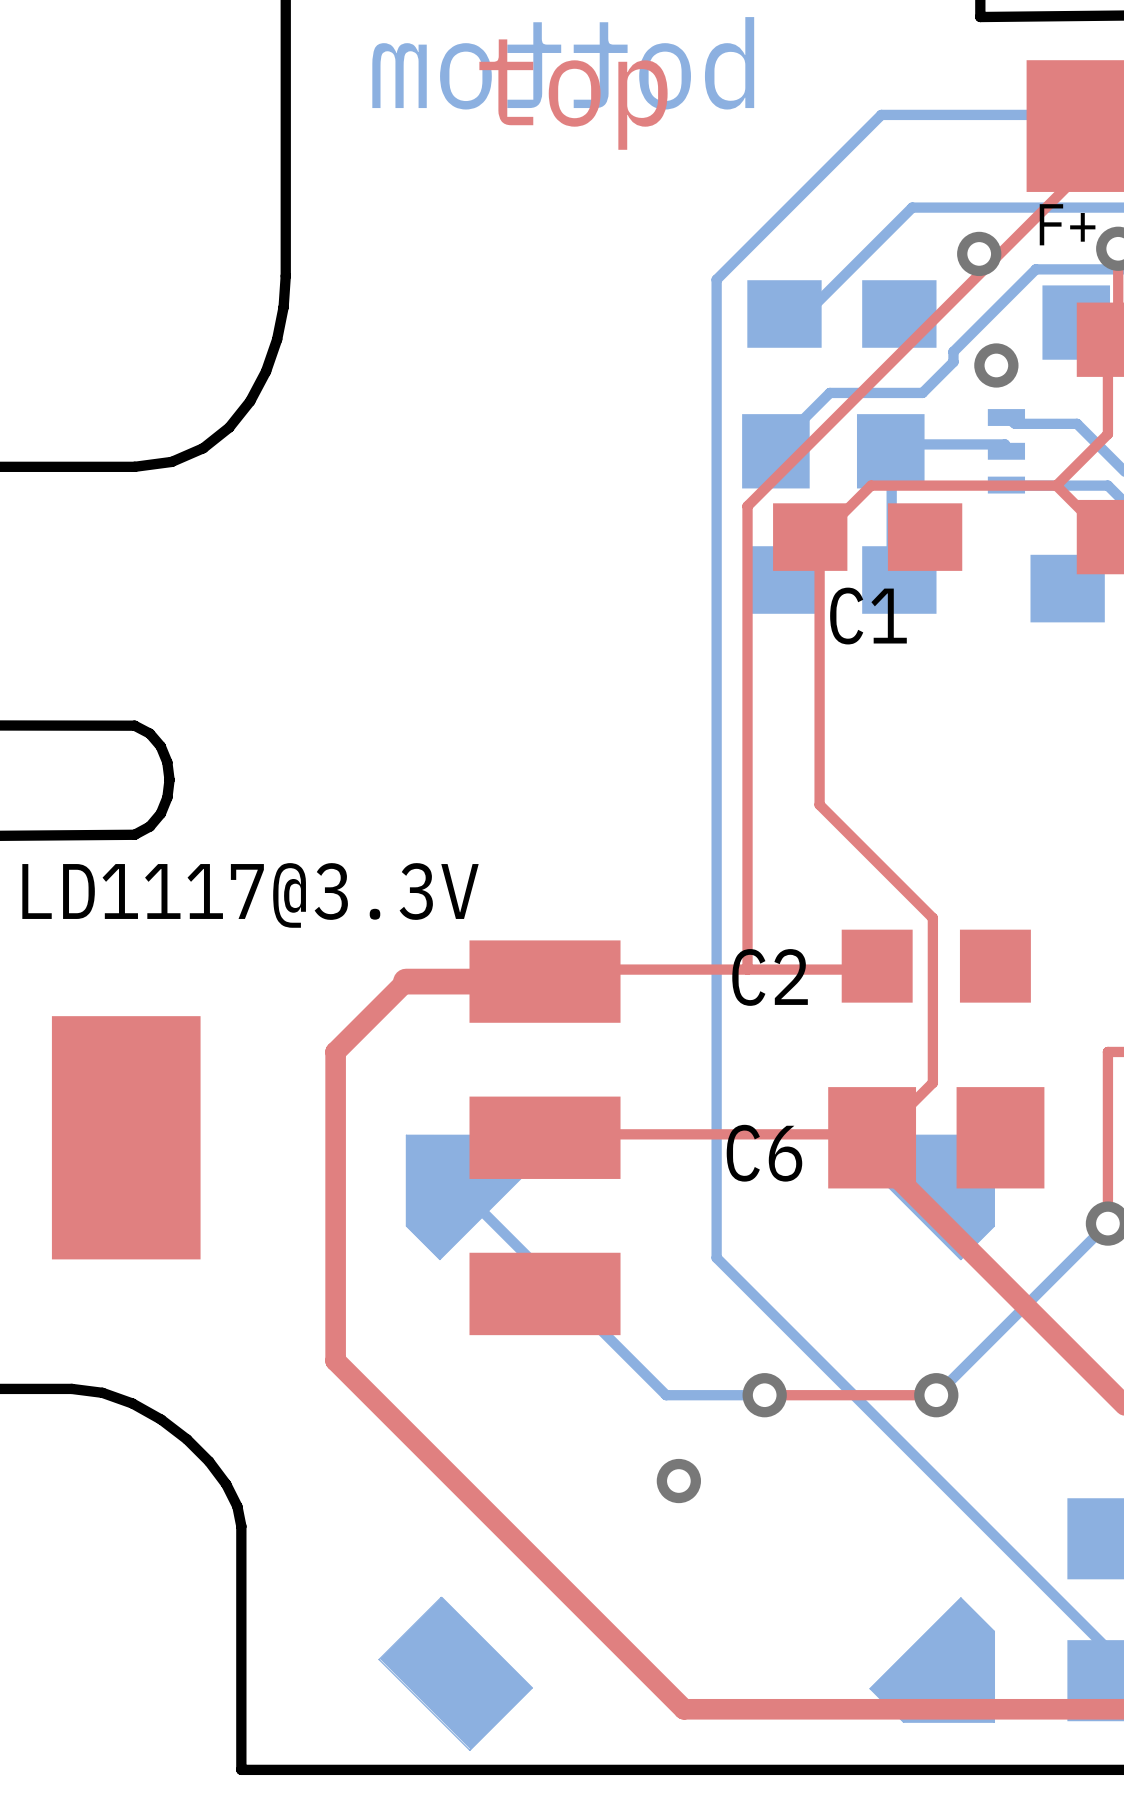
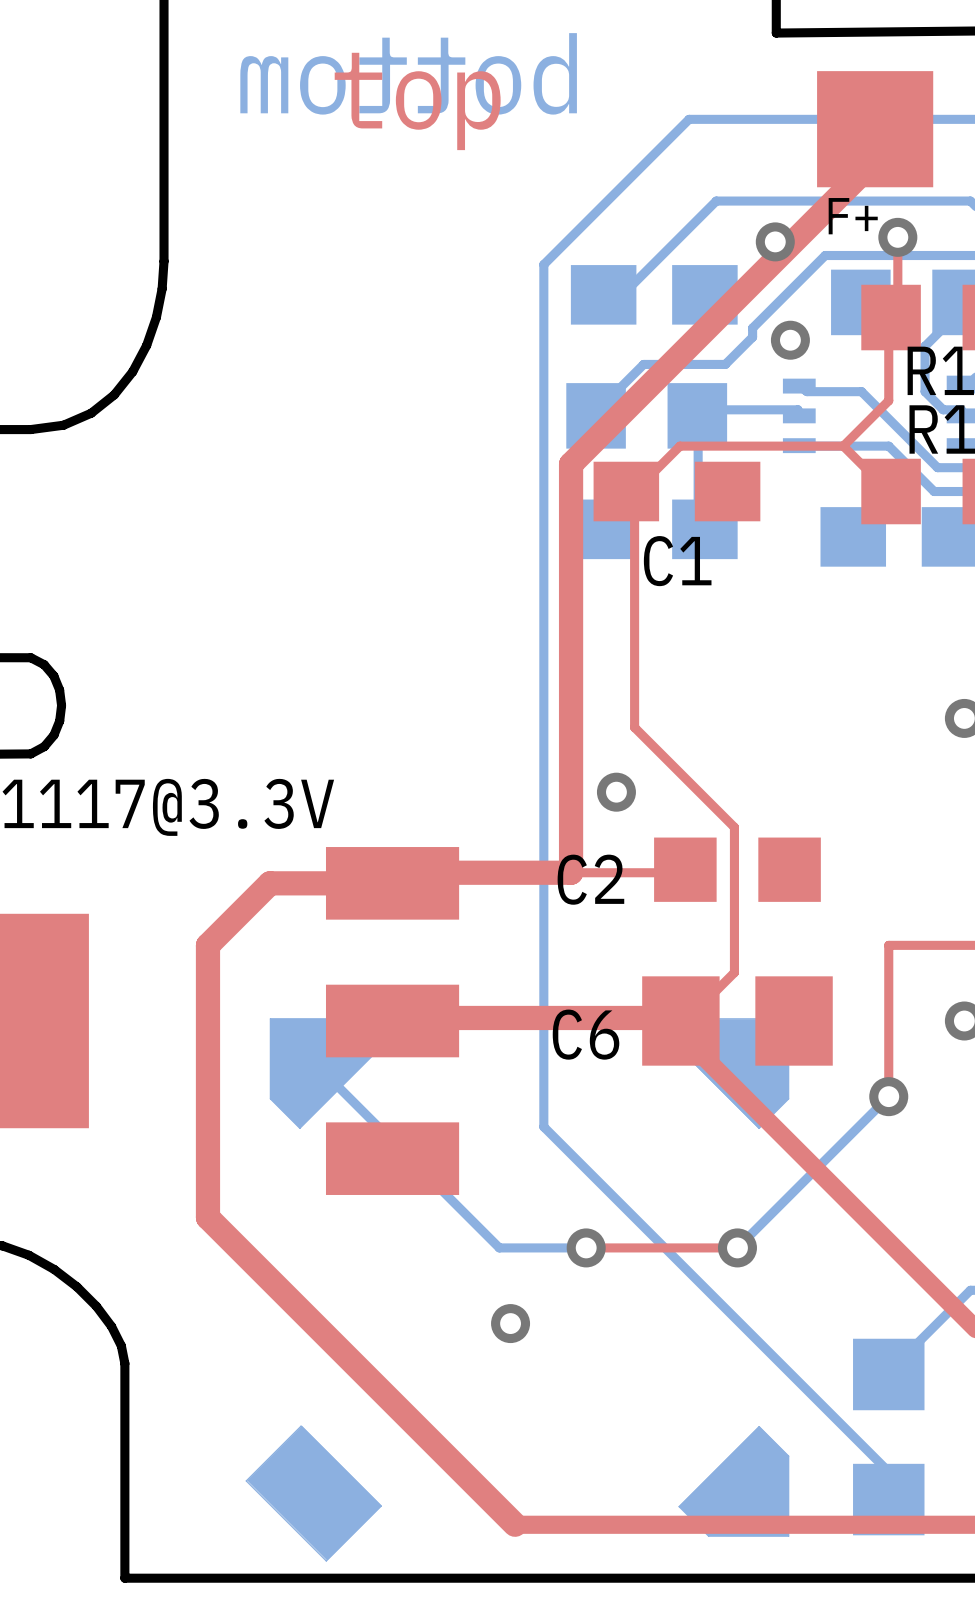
top track width: thin (1087, 166) (747, 506) (747, 969) (562, 969) -> thick (870, 164) (571, 464) (571, 872) (407, 872)
via: none -> (616, 792)
top track width: thin (545, 981) (405, 981) (335, 1051) (335, 1360) (684, 1709) -> thick (392, 883) (270, 883) (207, 945) (207, 1217) (515, 1524)
top track width: thin (551, 1134) (871, 1134) -> thick (398, 1017) (679, 1017)

